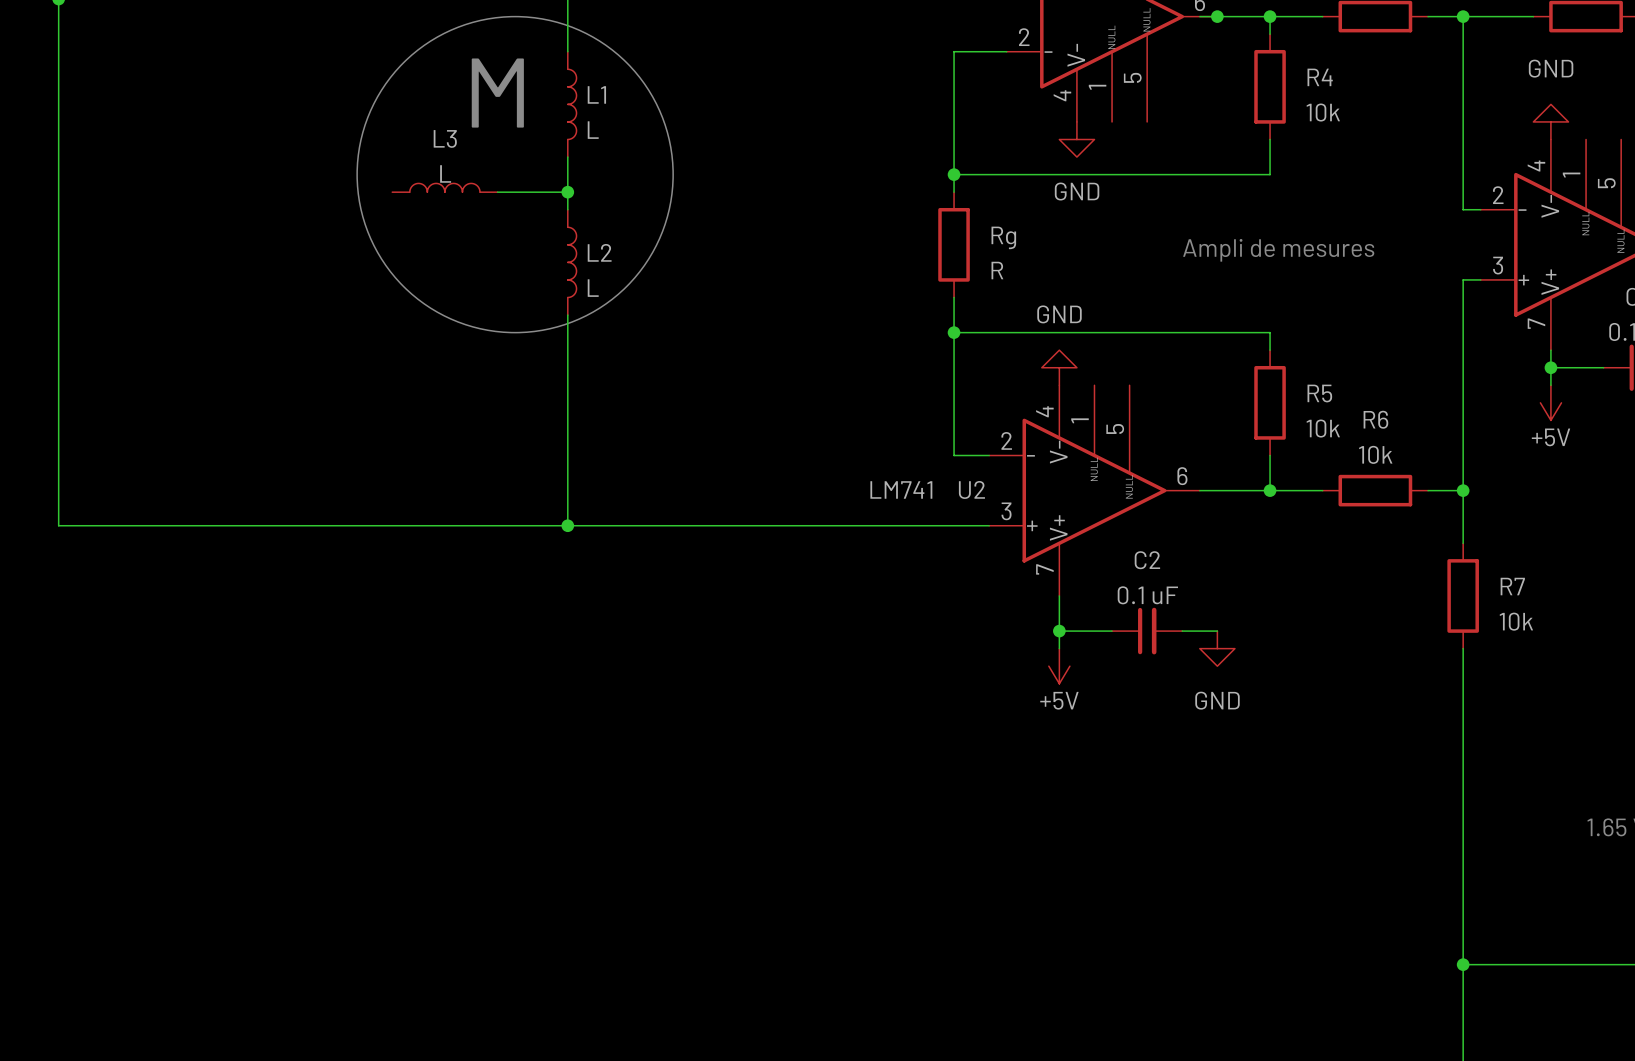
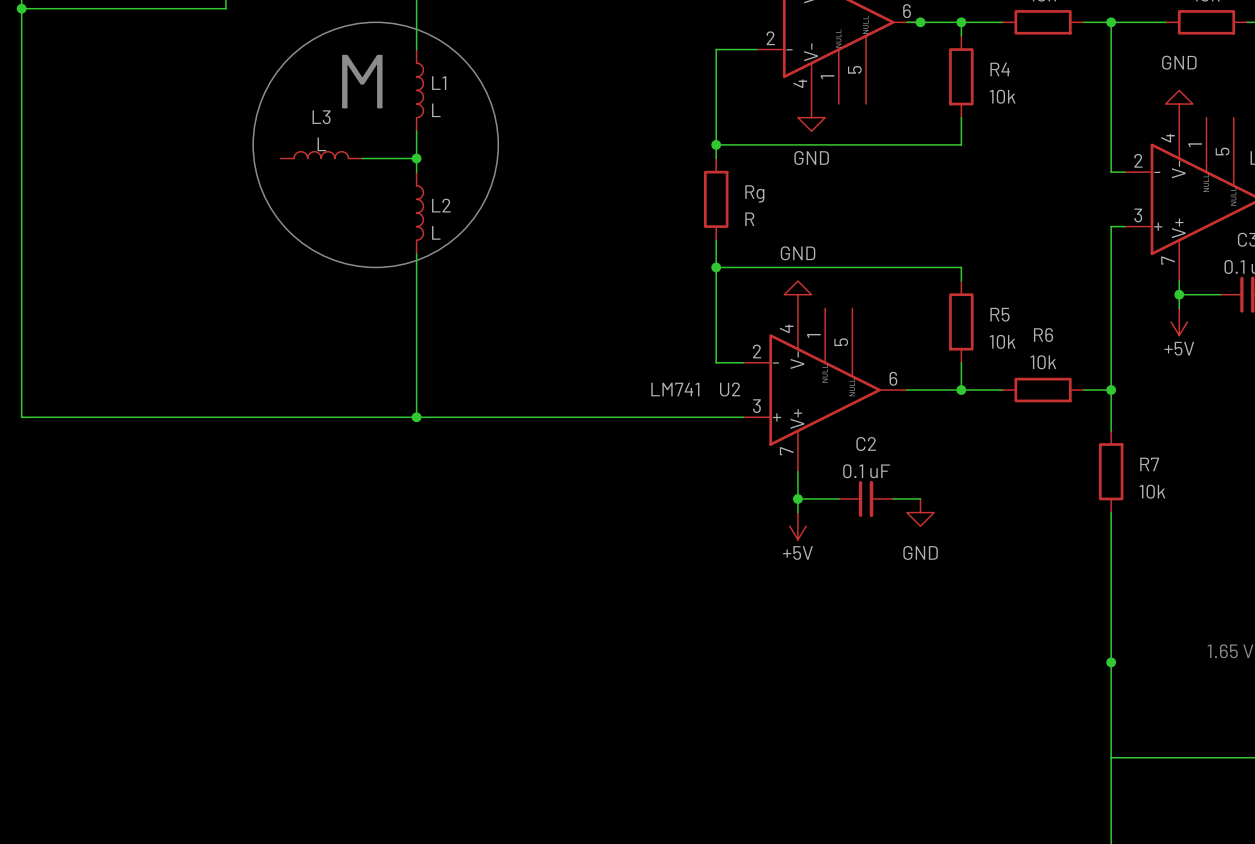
text: Ampli de mesures (1278, 250) -> none
junction: none -> (1111, 662)
junction: (1463, 964) -> none

